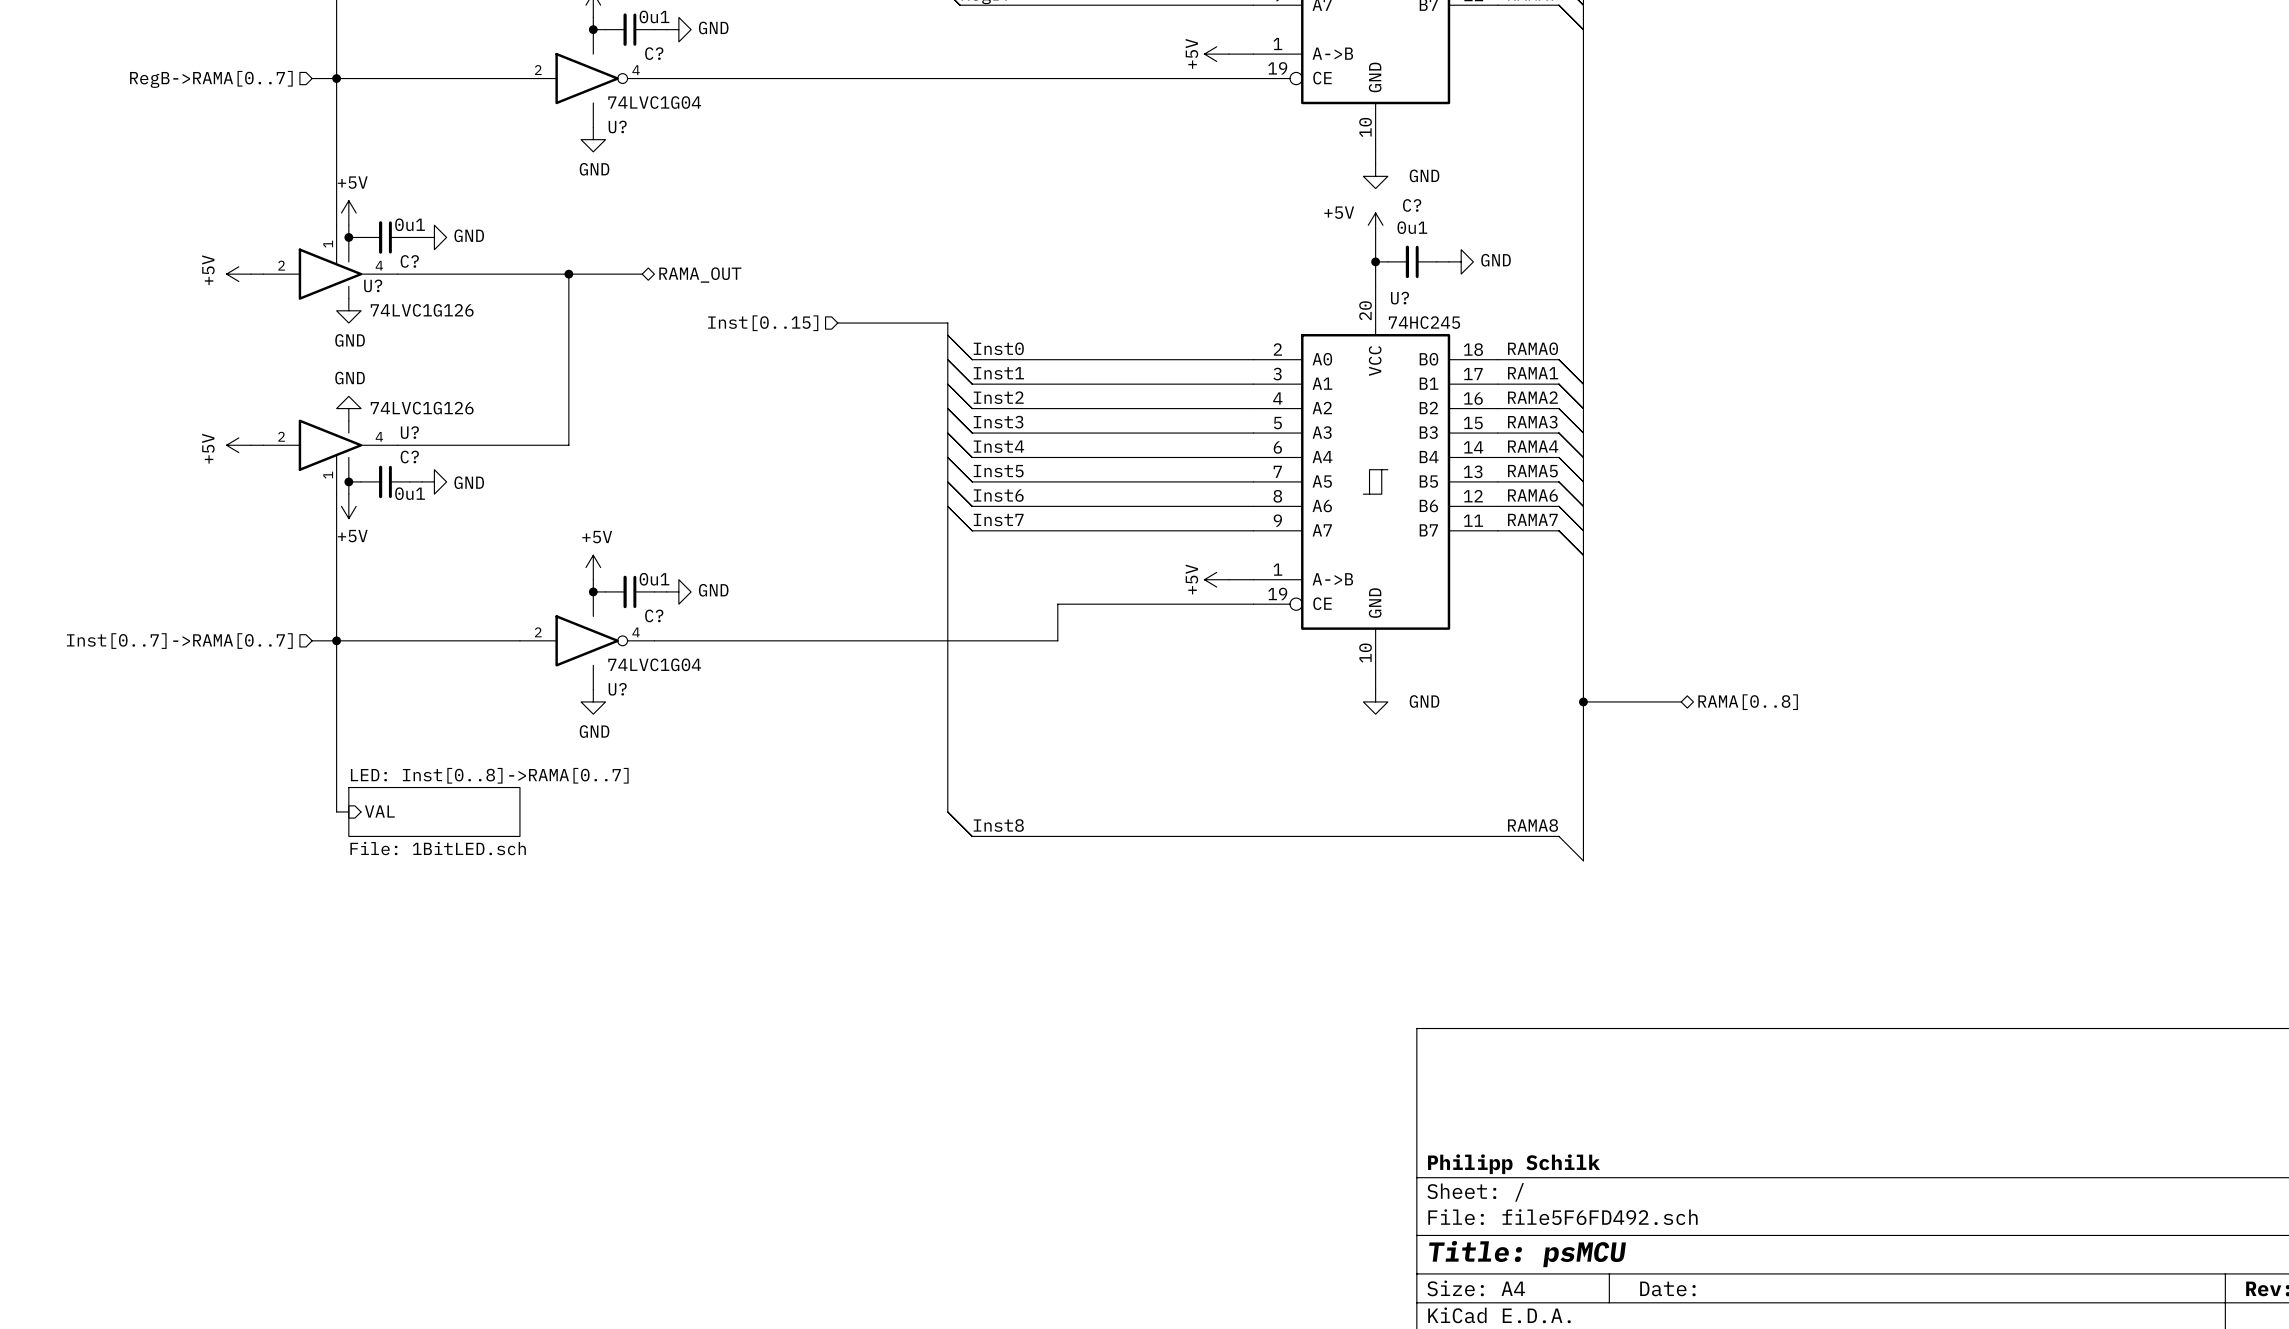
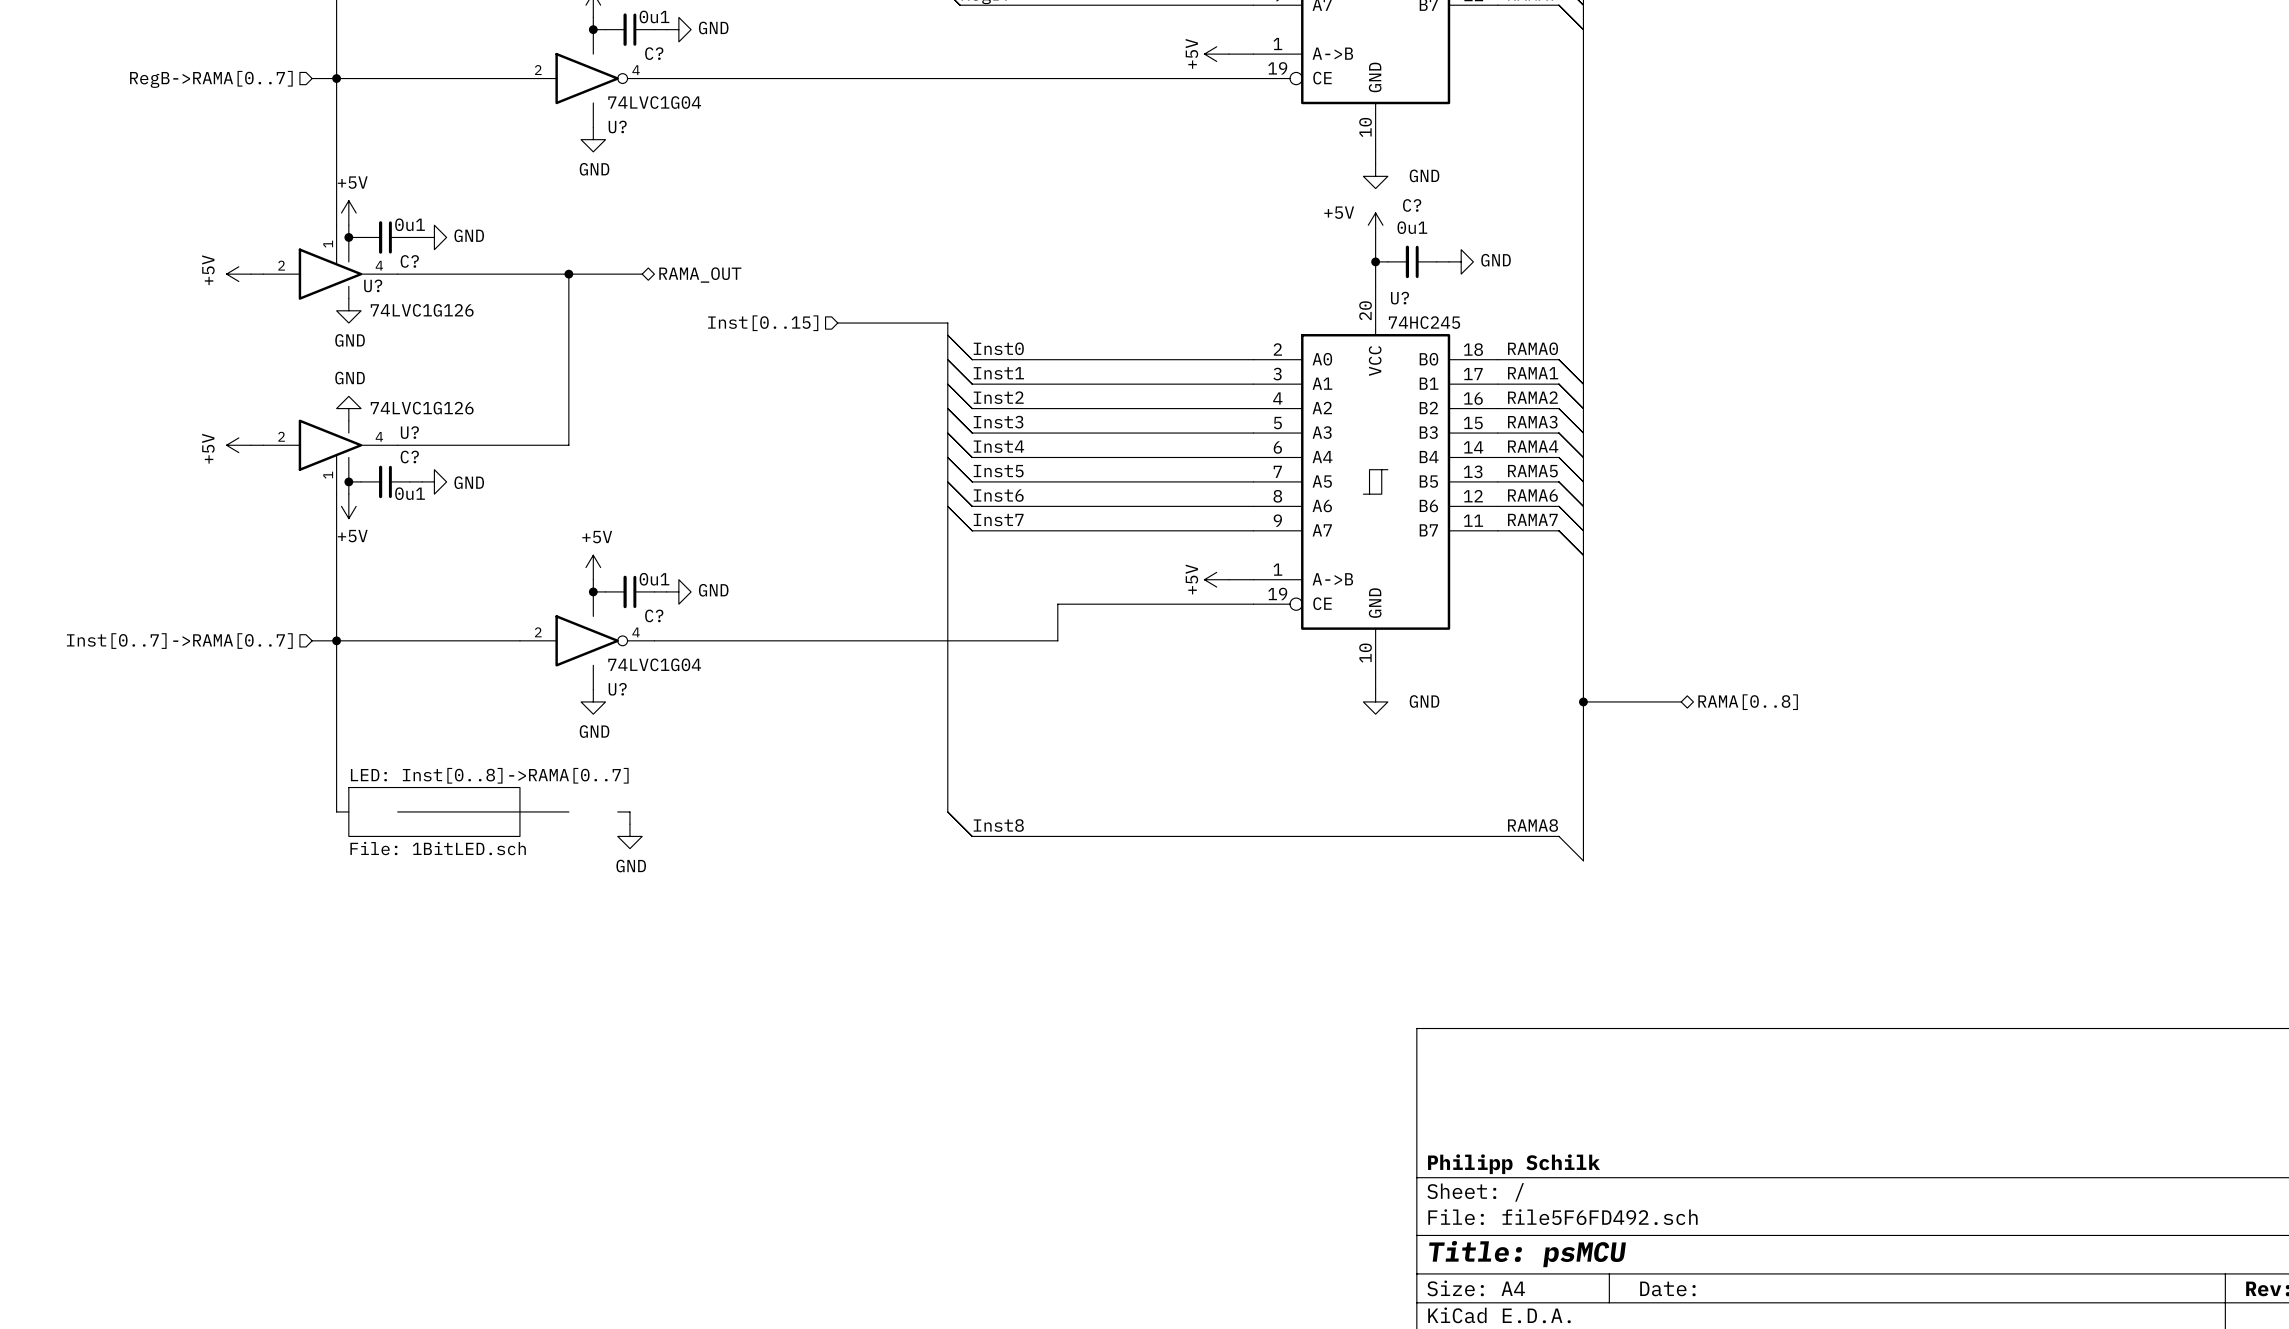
sheet pin: VAL (379, 811) -> none
wire: none -> (397, 811) (568, 811)
wire: none -> (617, 811) (629, 811) (629, 824)
power symbol: none -> GND (629, 836)

